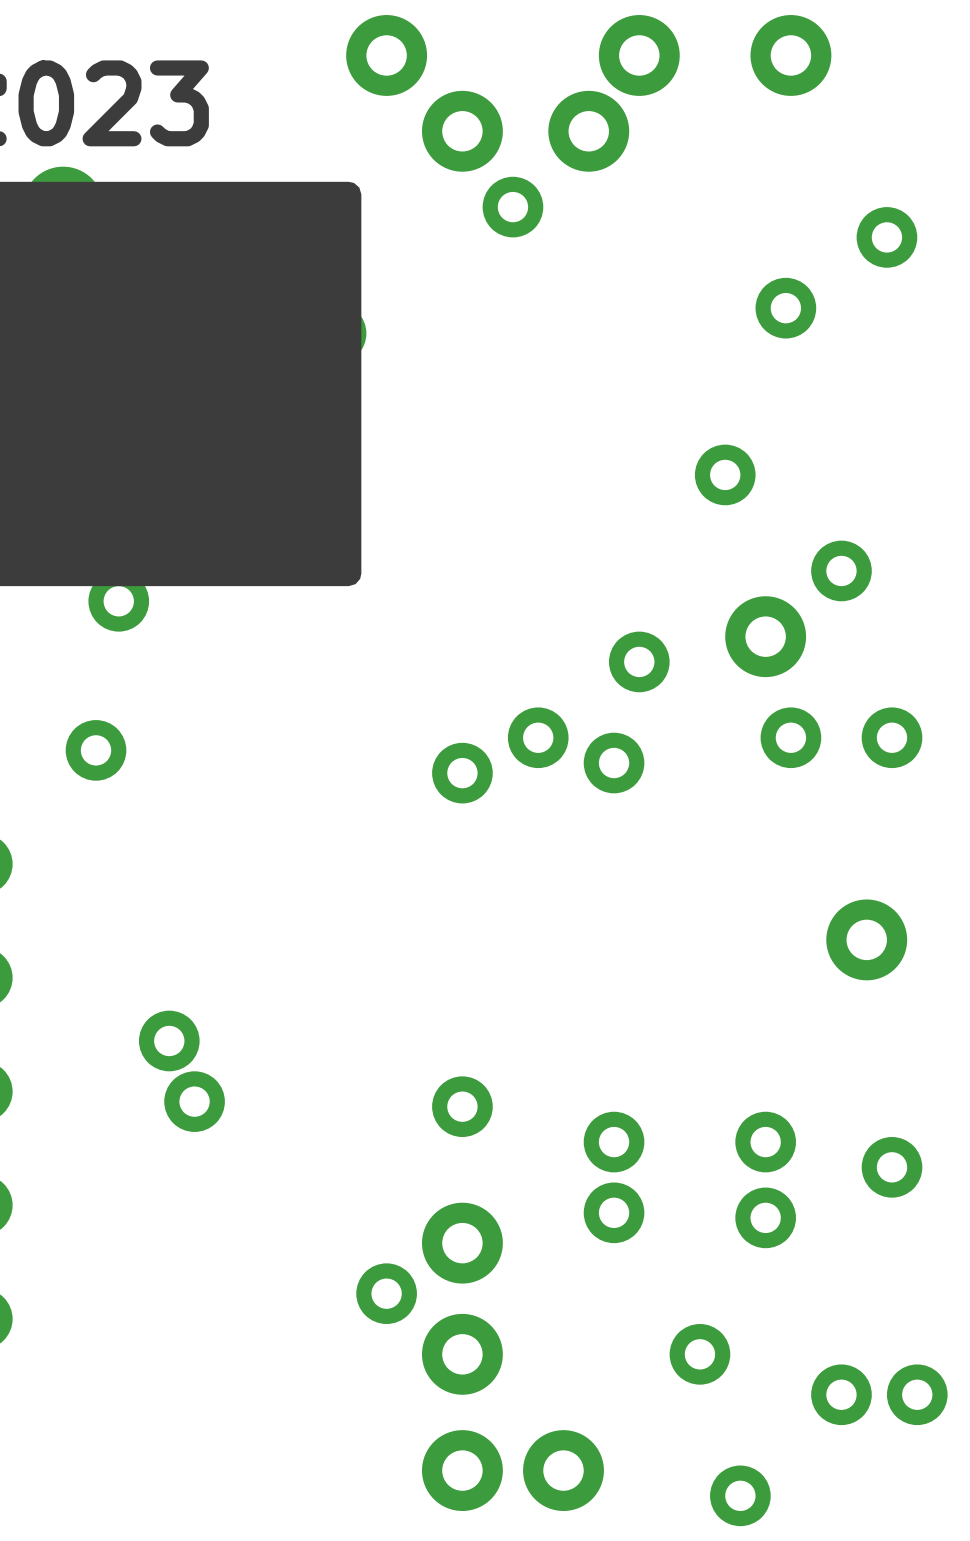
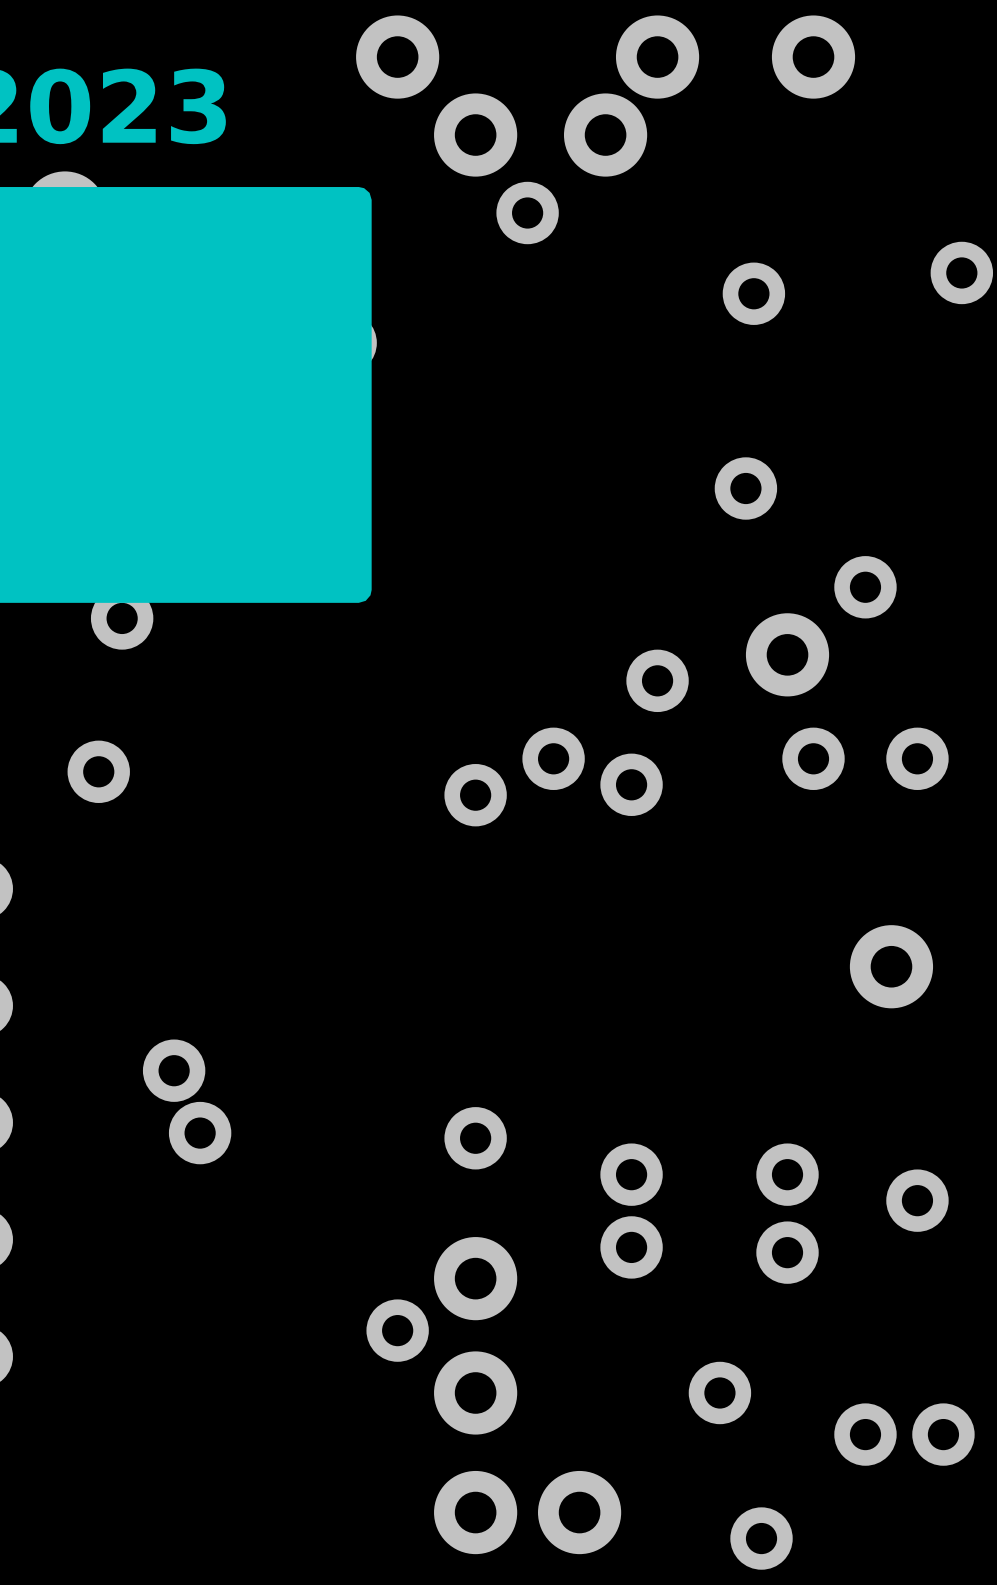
via position: (886, 237) -> (961, 272)
via position: (785, 308) -> (753, 293)

